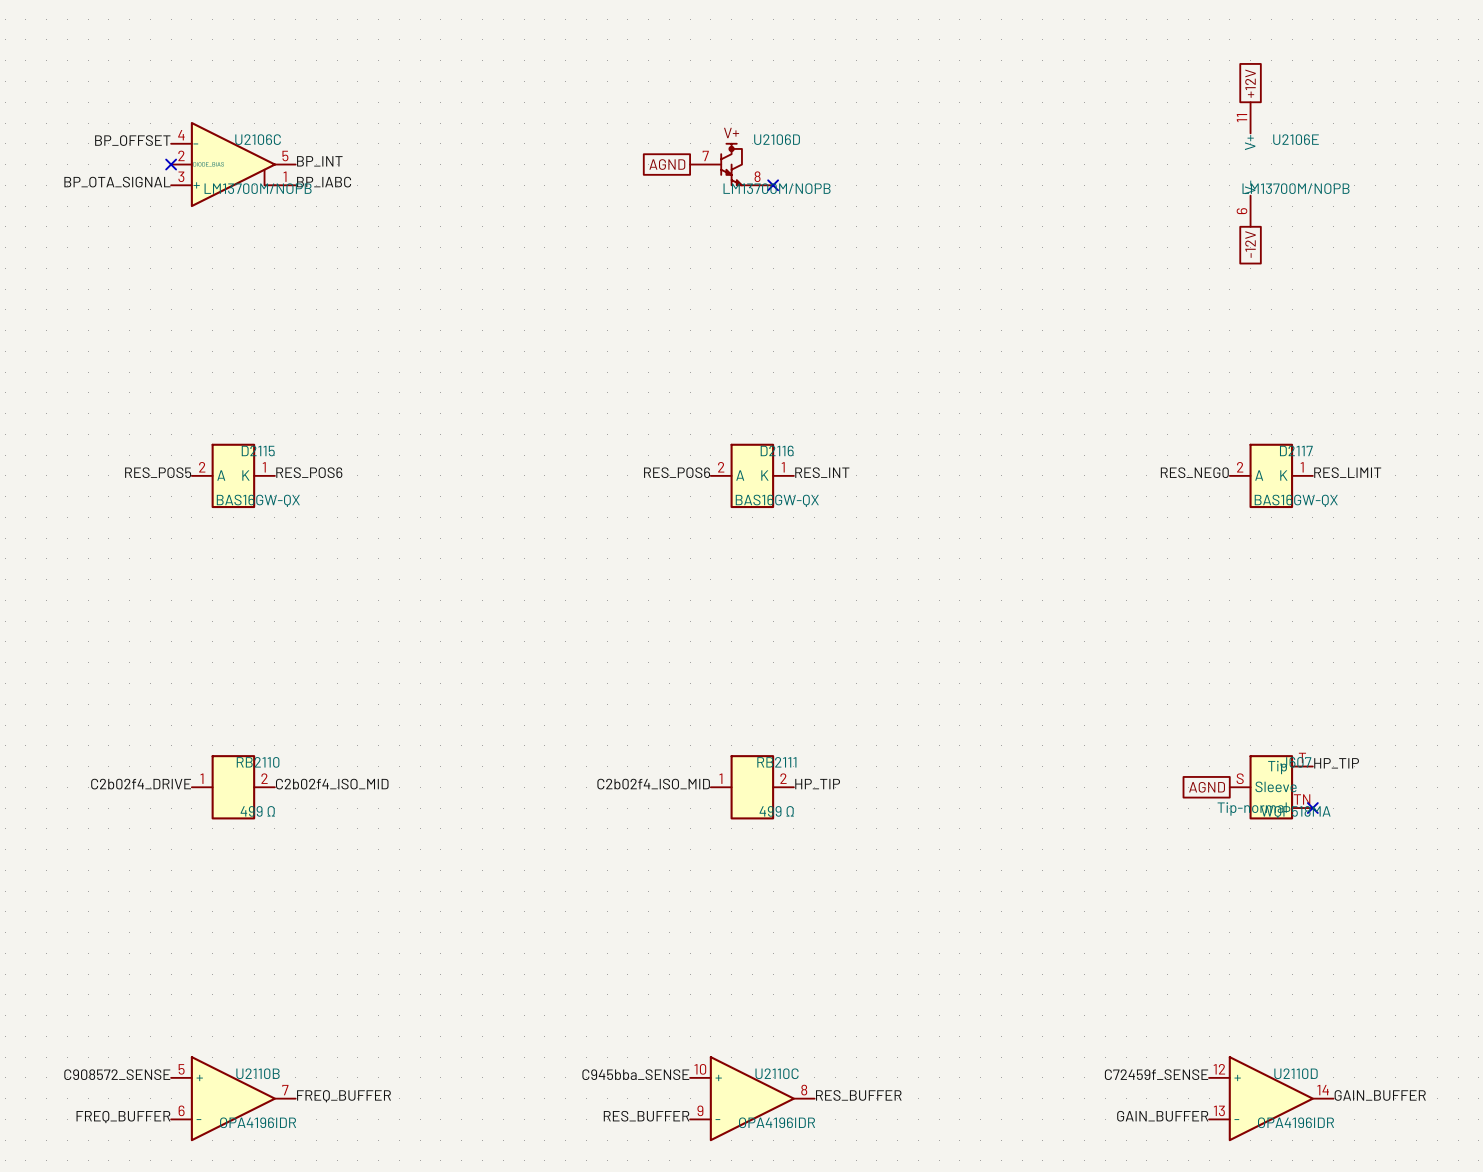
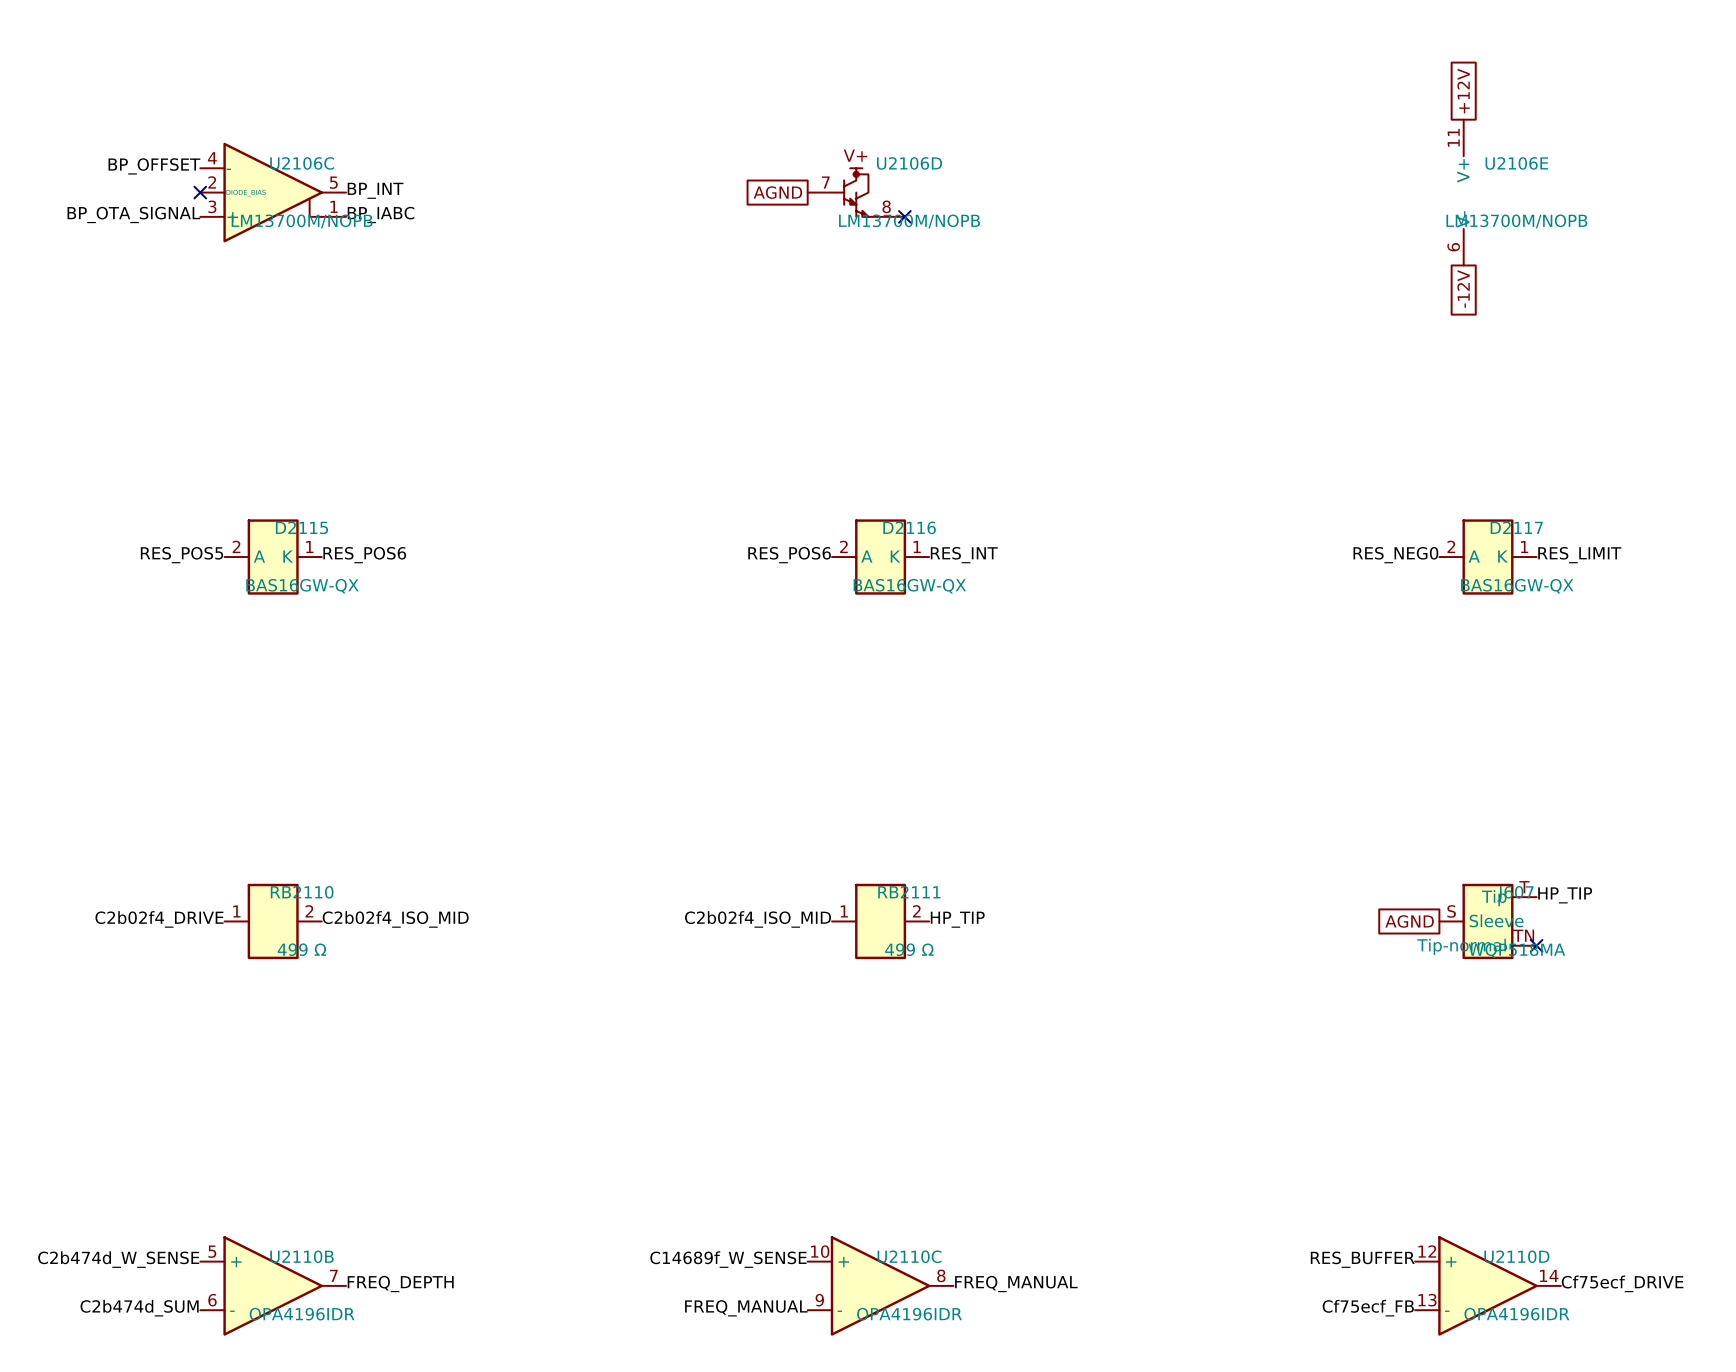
label: C908572_SENSE (117, 1074) -> C2b474d_W_SENSE (118, 1259)
label: C945bba_SENSE (635, 1074) -> C14689f_W_SENSE (728, 1259)
label: C72459f_SENSE (1156, 1074) -> RES_BUFFER (1362, 1259)
label: RES_BUFFER (858, 1095) -> FREQ_MANUAL (1016, 1284)
label: GAIN_BUFFER (1380, 1095) -> Cf75ecf_DRIVE (1622, 1283)
label: FREQ_BUFFER (343, 1096) -> FREQ_DEPTH (400, 1284)
label: RES_BUFFER (646, 1116) -> FREQ_MANUAL (746, 1308)
label: GAIN_BUFFER (1162, 1116) -> Cf75ecf_FB (1368, 1308)
label: FREQ_BUFFER (123, 1117) -> C2b474d_SUM (139, 1308)

